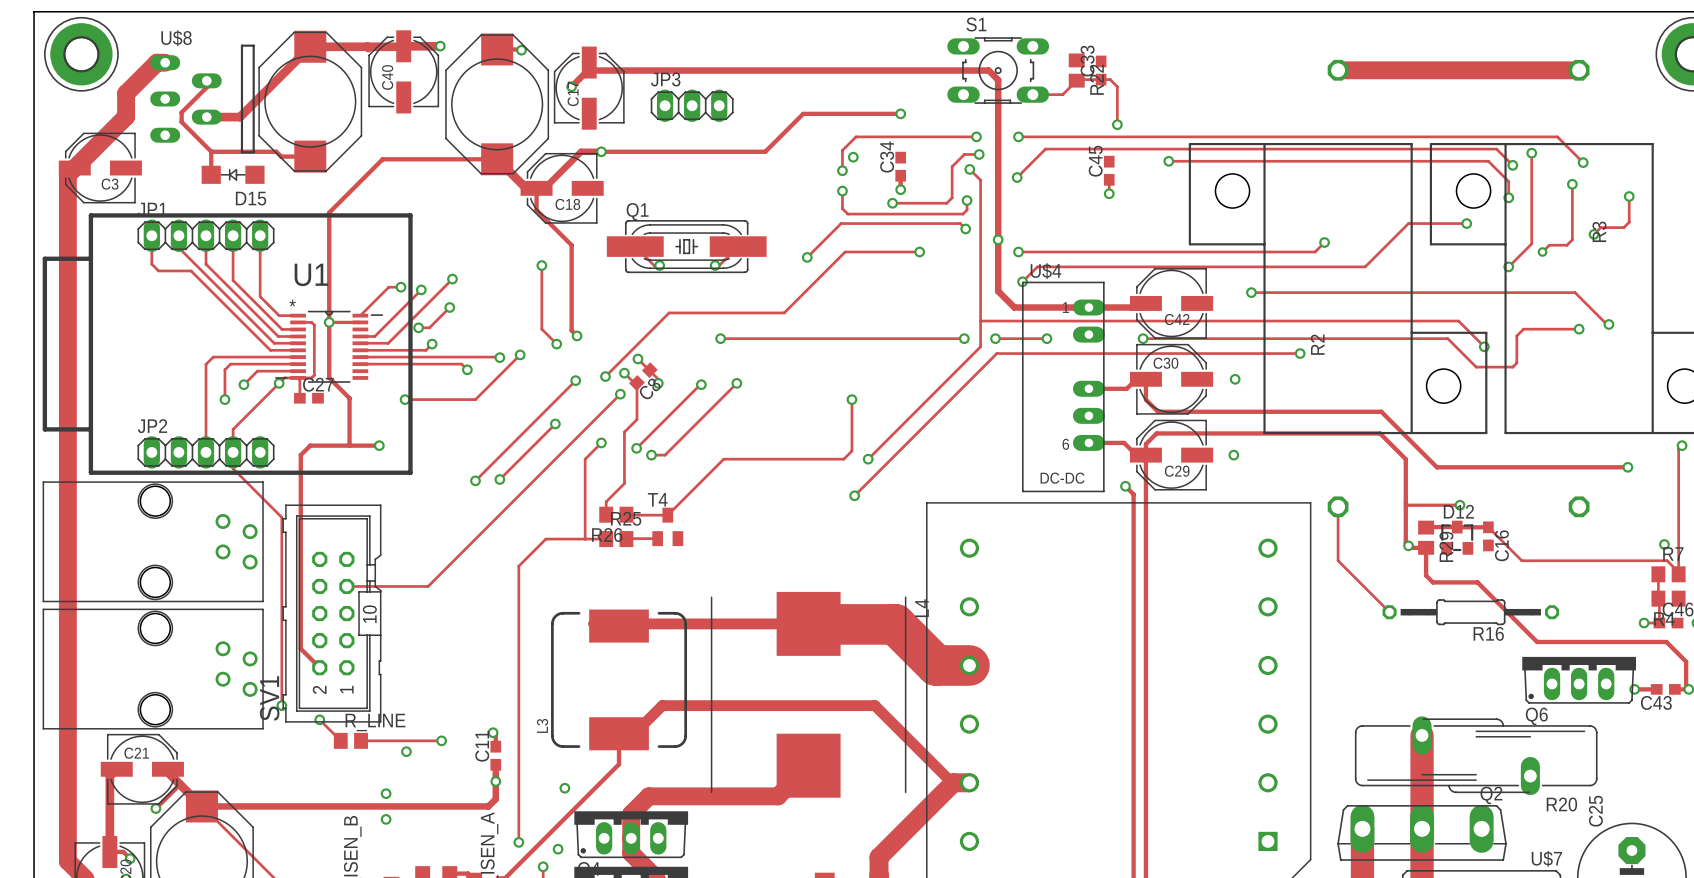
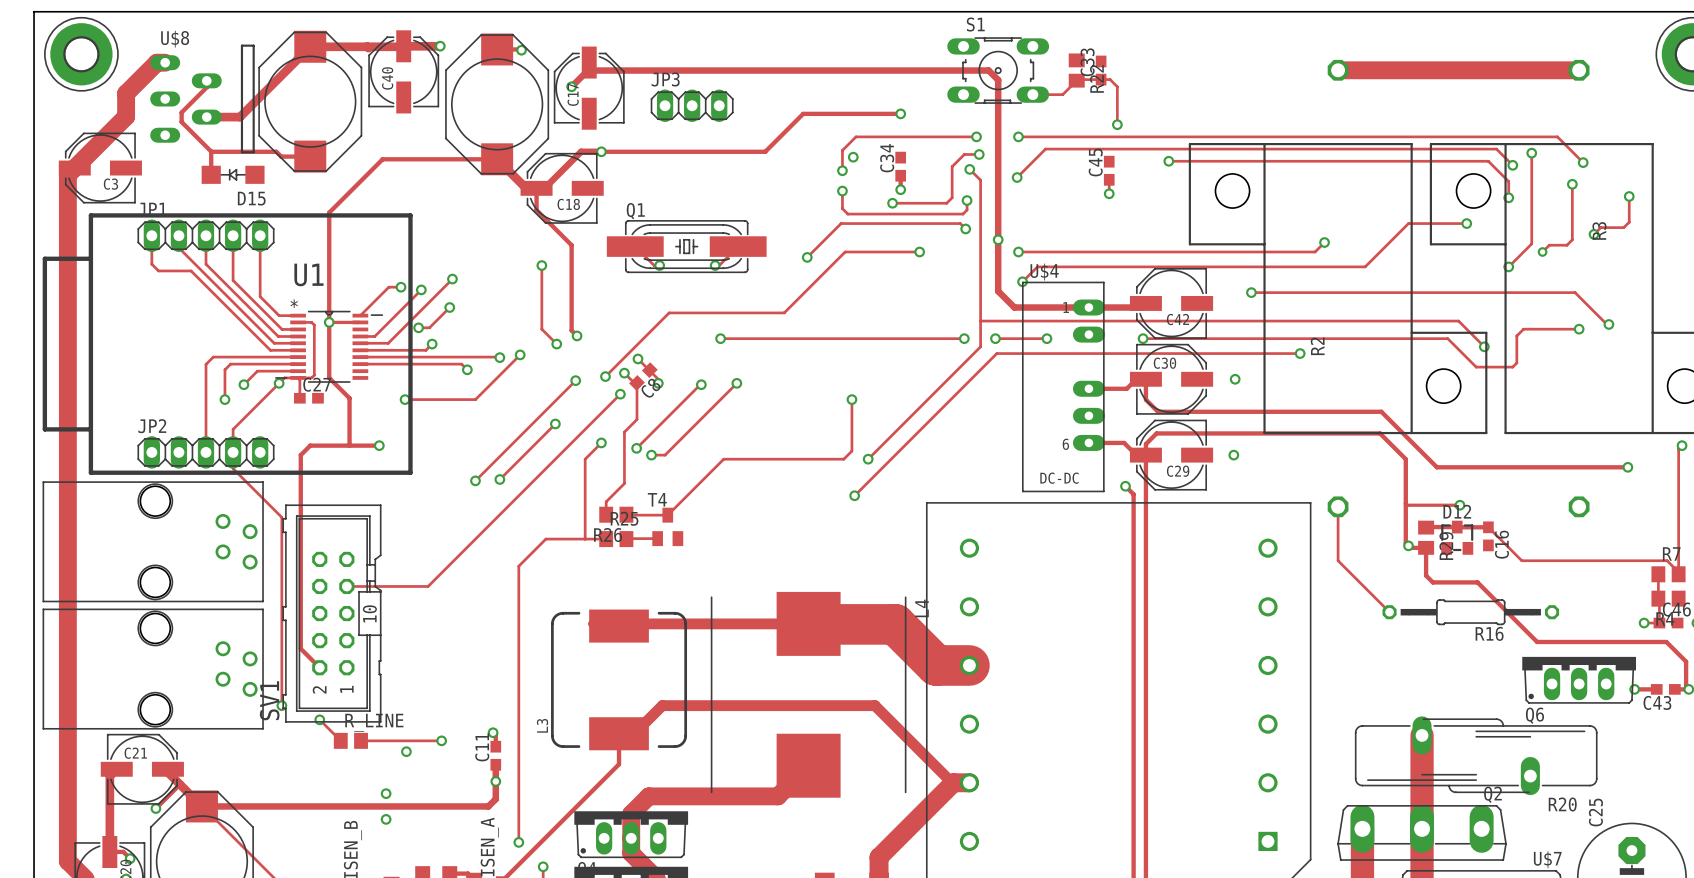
via: (1664, 544) -> none
via: (564, 788) -> none
via: (558, 849) -> none

